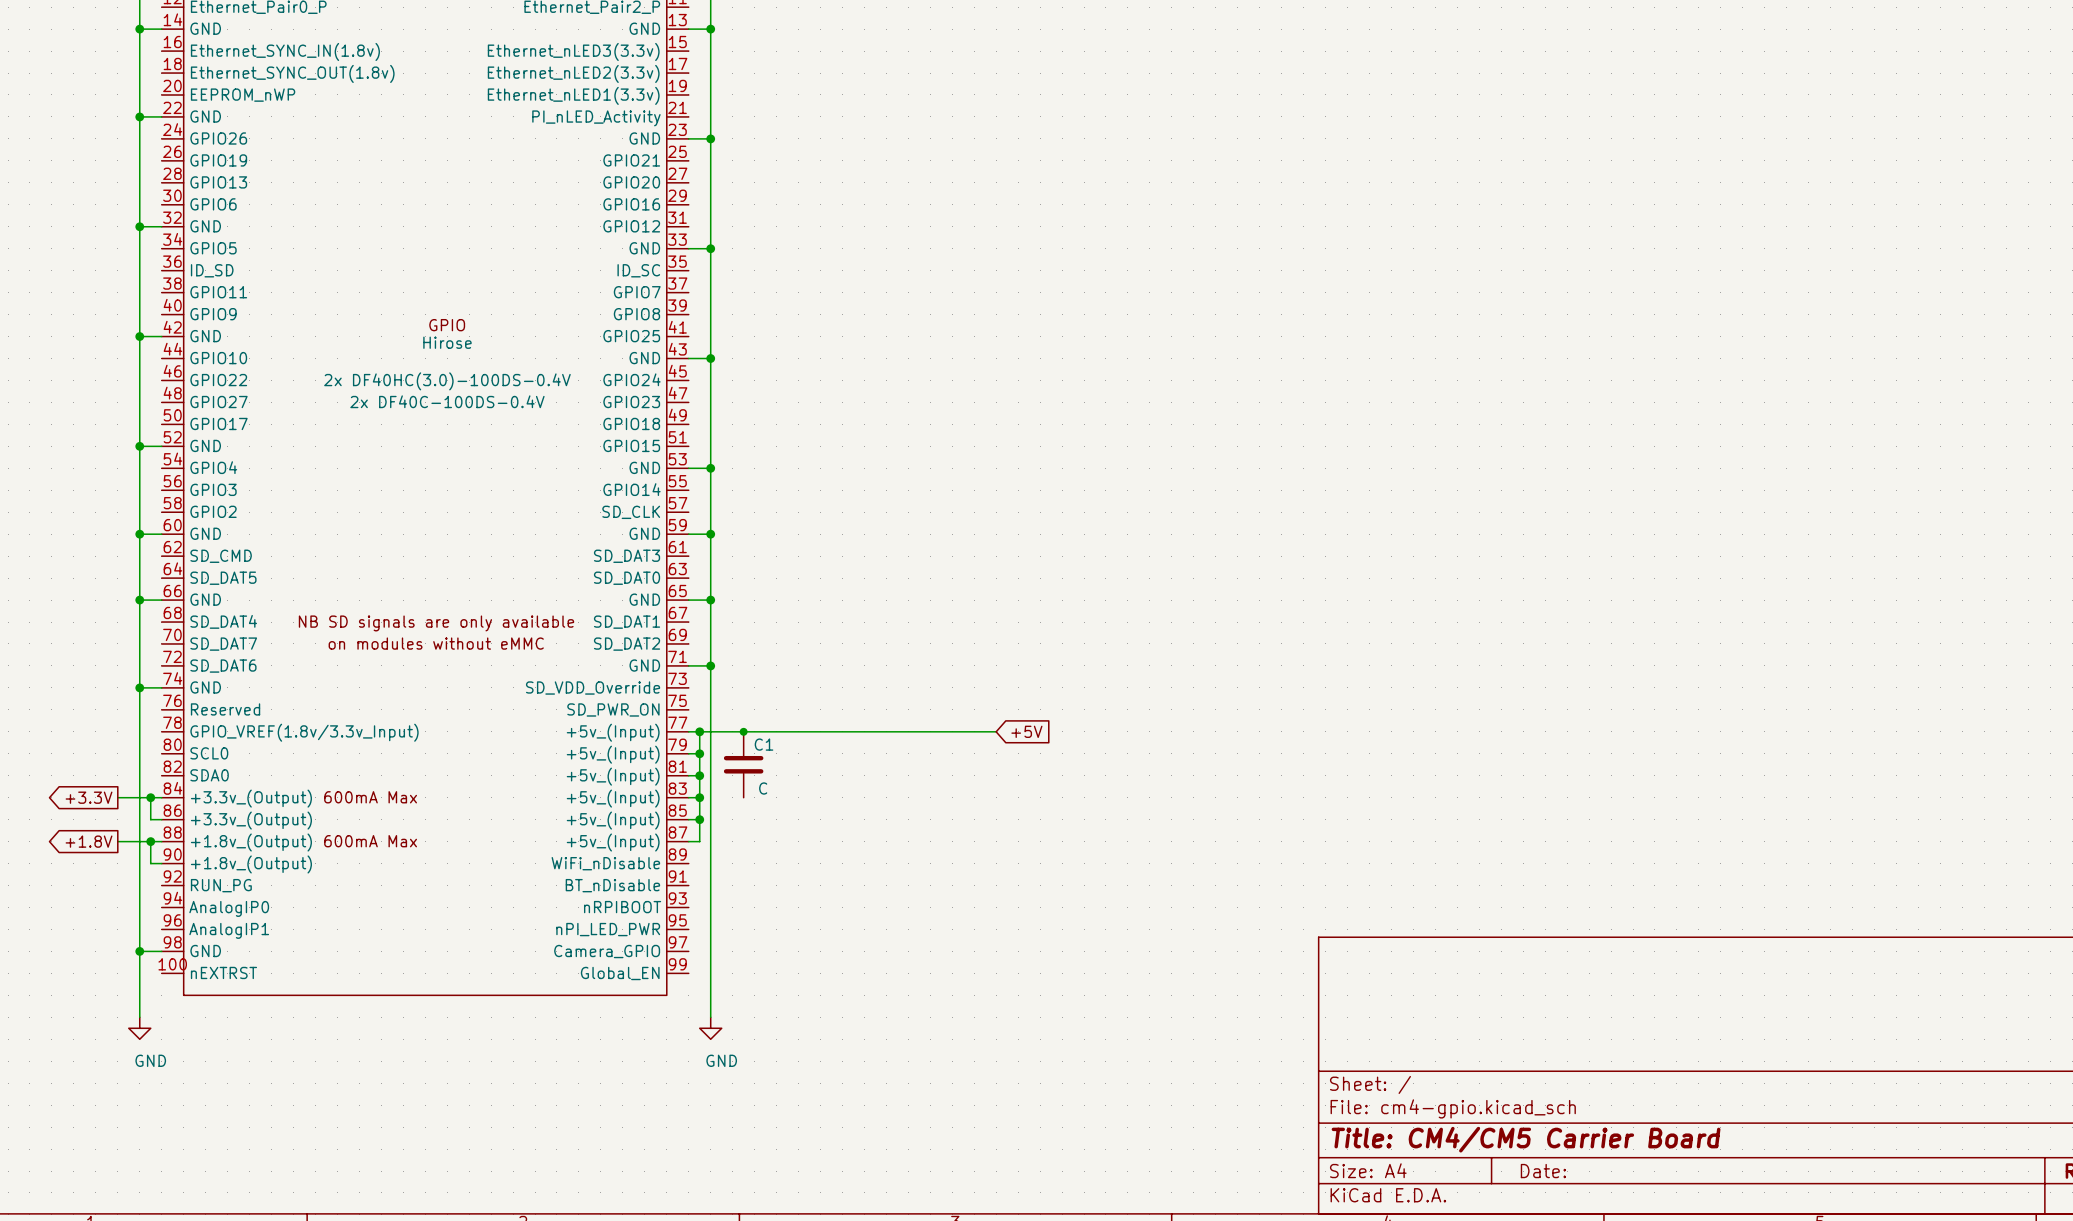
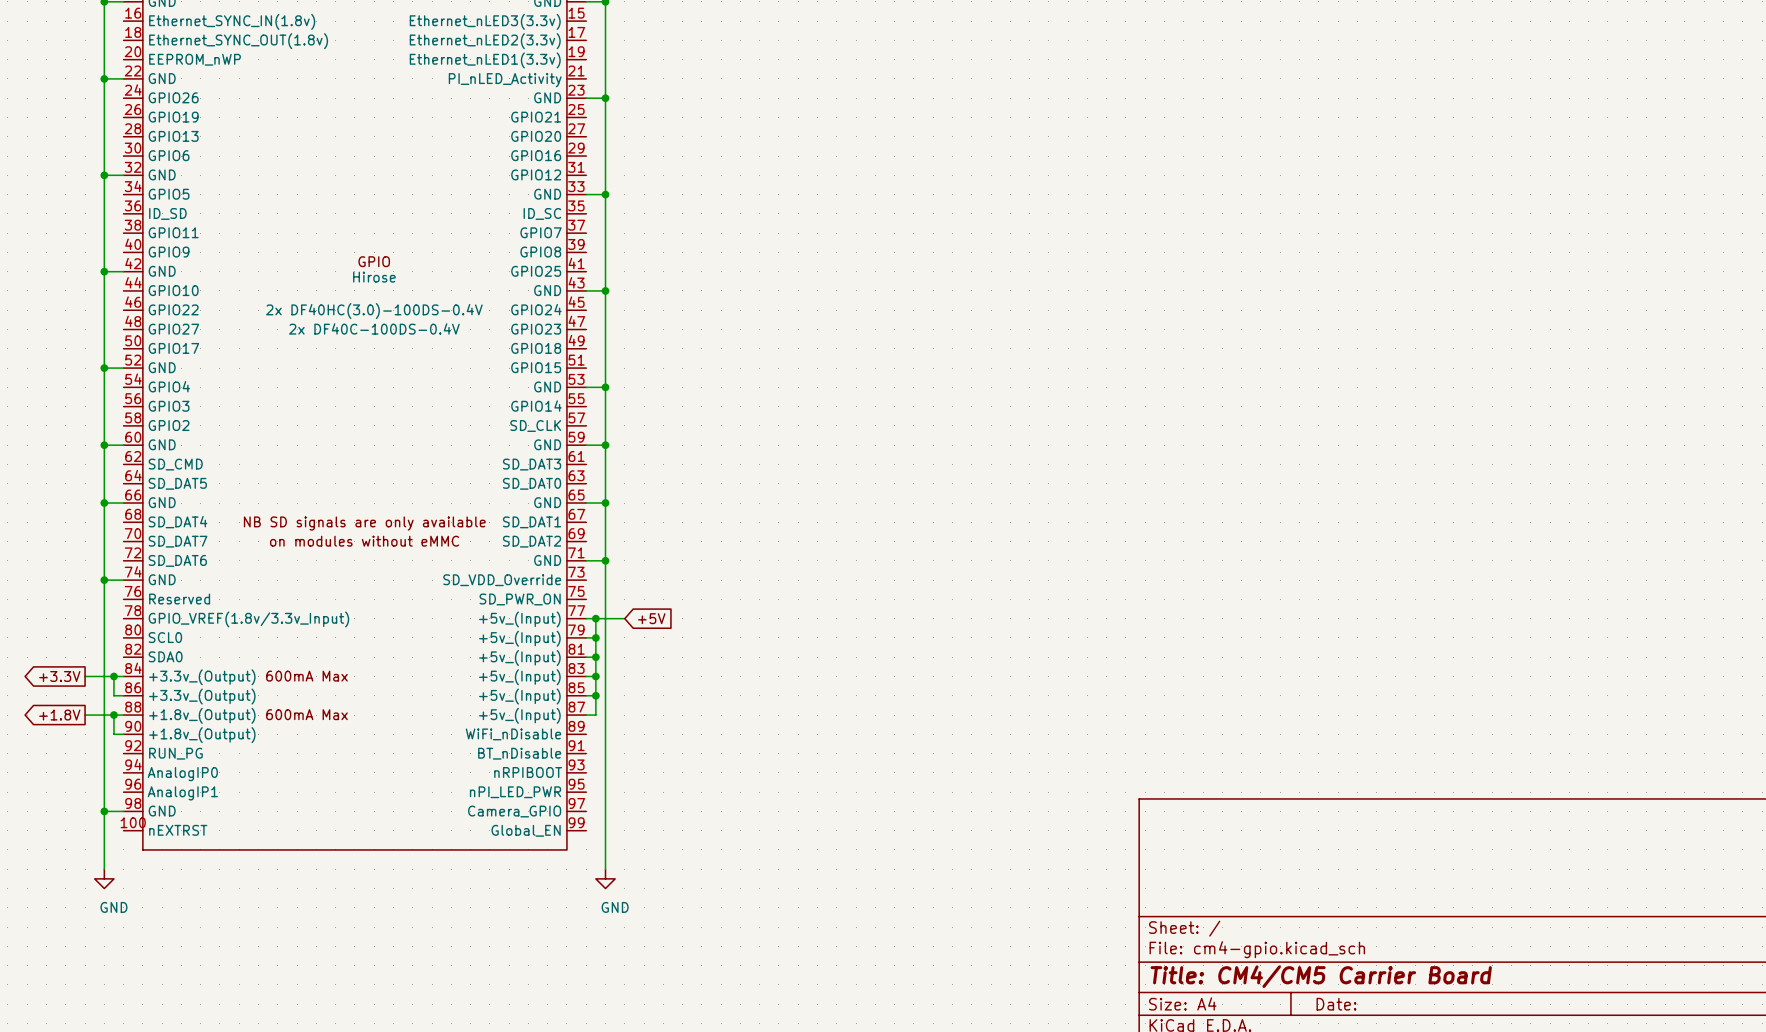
wire: (732, 731) (996, 731) -> none
junction: (743, 731) -> none
global label: none -> +5V (651, 618)
global label: +5V (1026, 731) -> none
C1: C (743, 764) -> none

